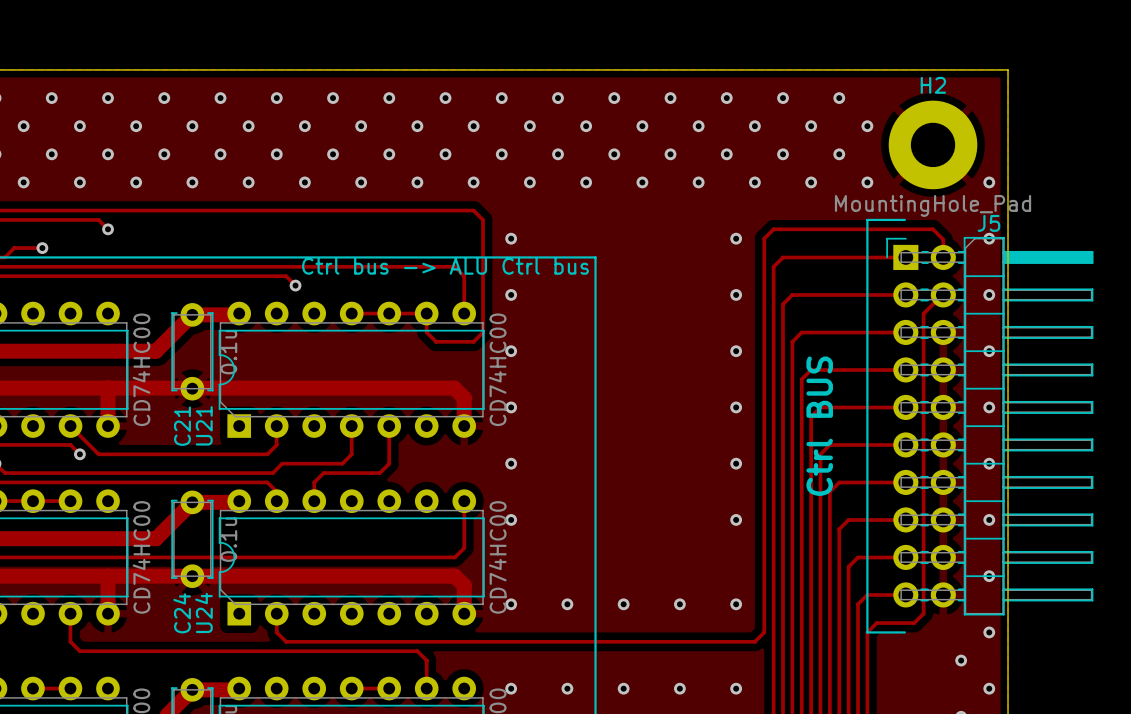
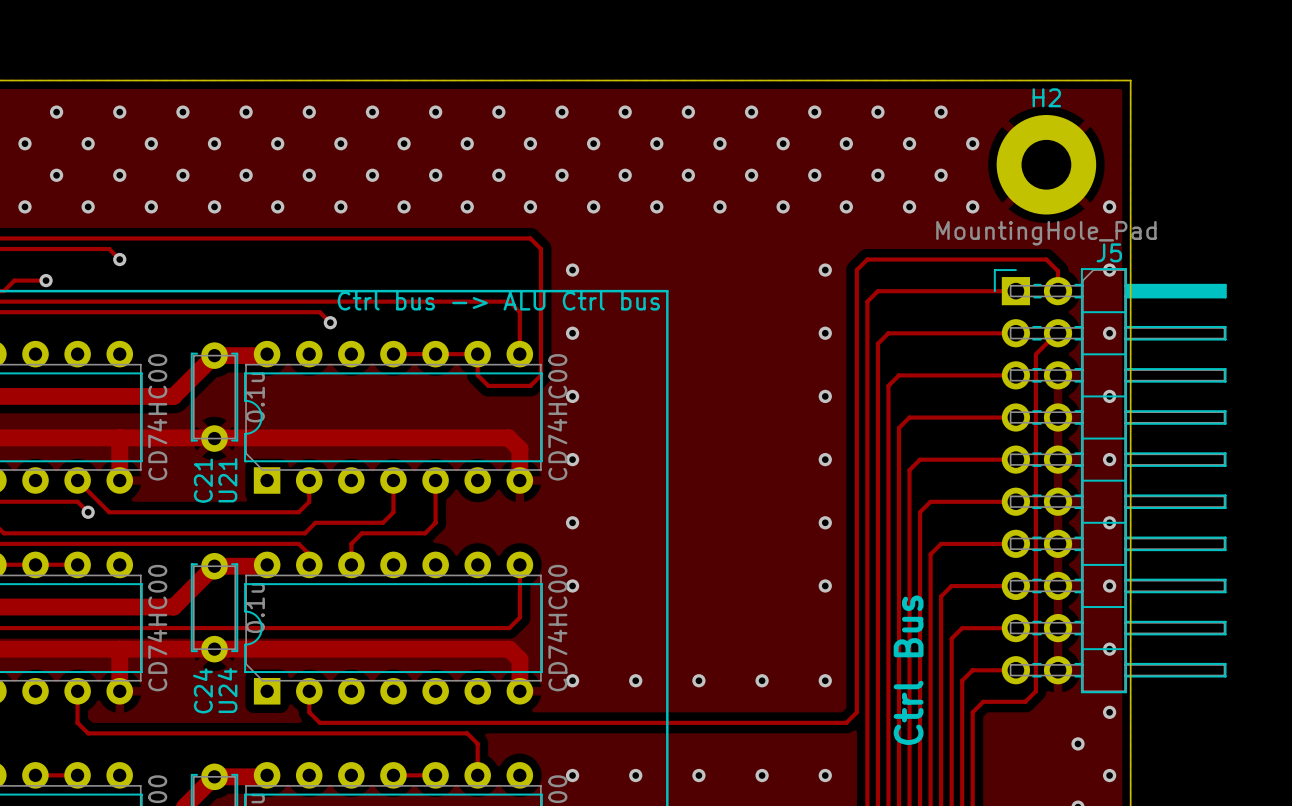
line: (904, 219) (867, 219) (867, 632) (904, 632) -> none
text: Ctrl BUS (819, 426) -> Ctrl Bus (908, 670)

